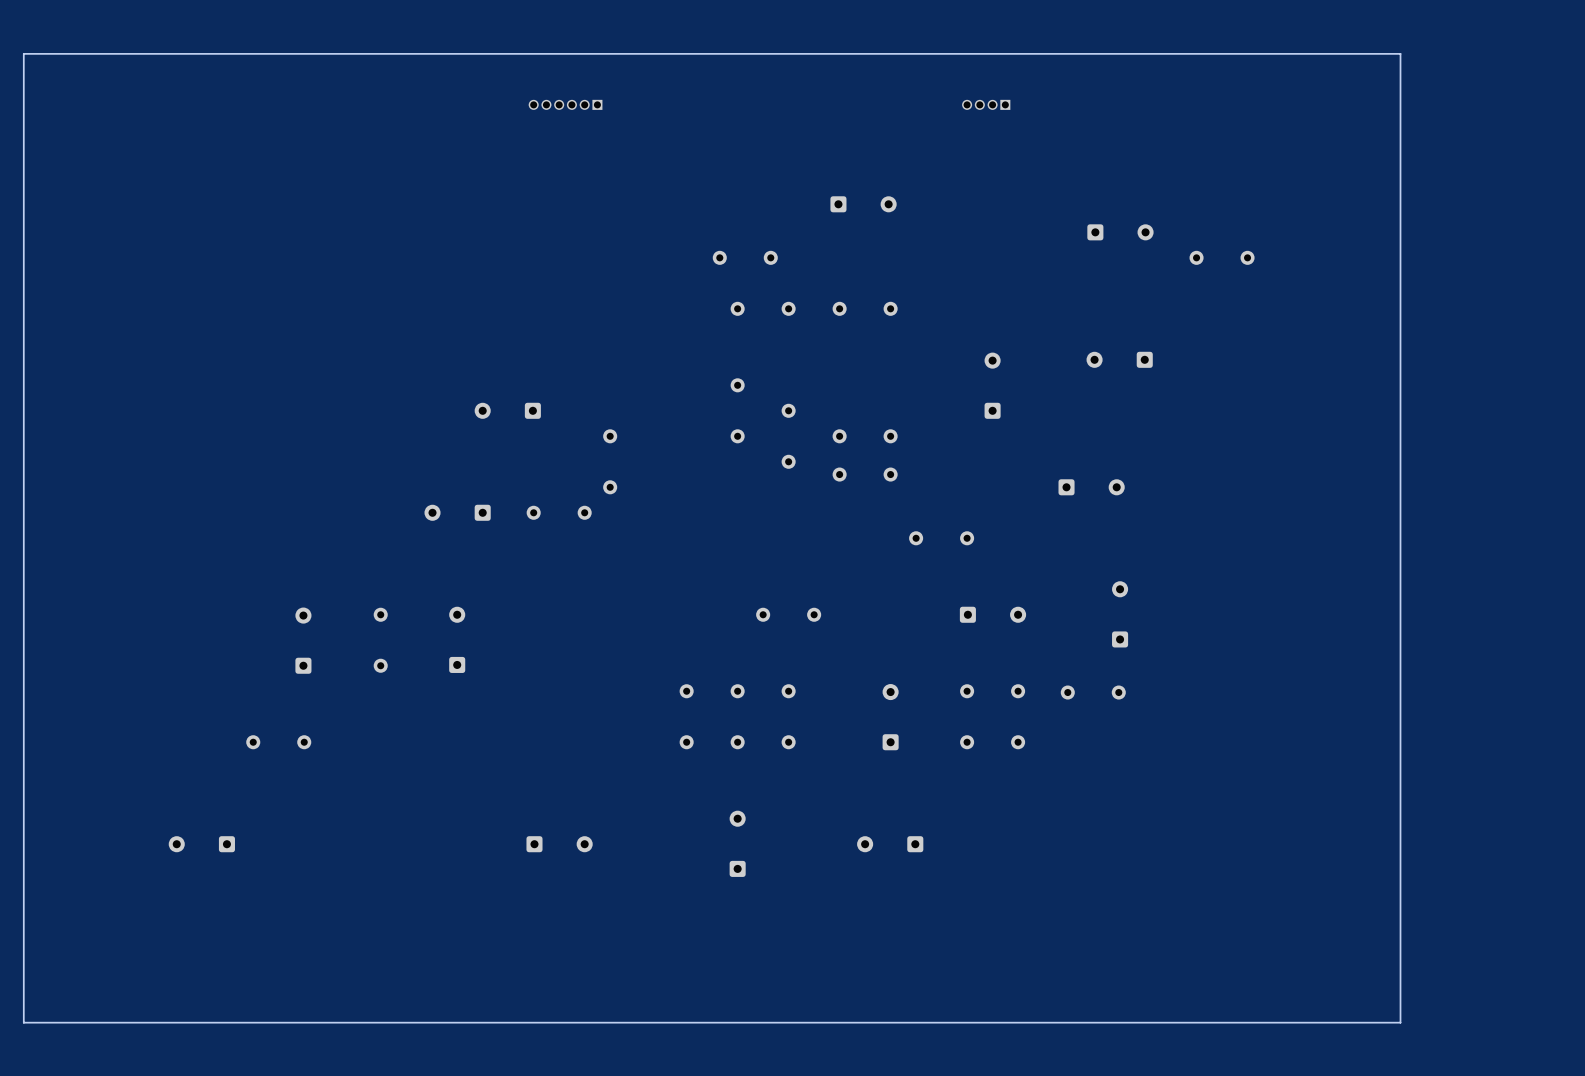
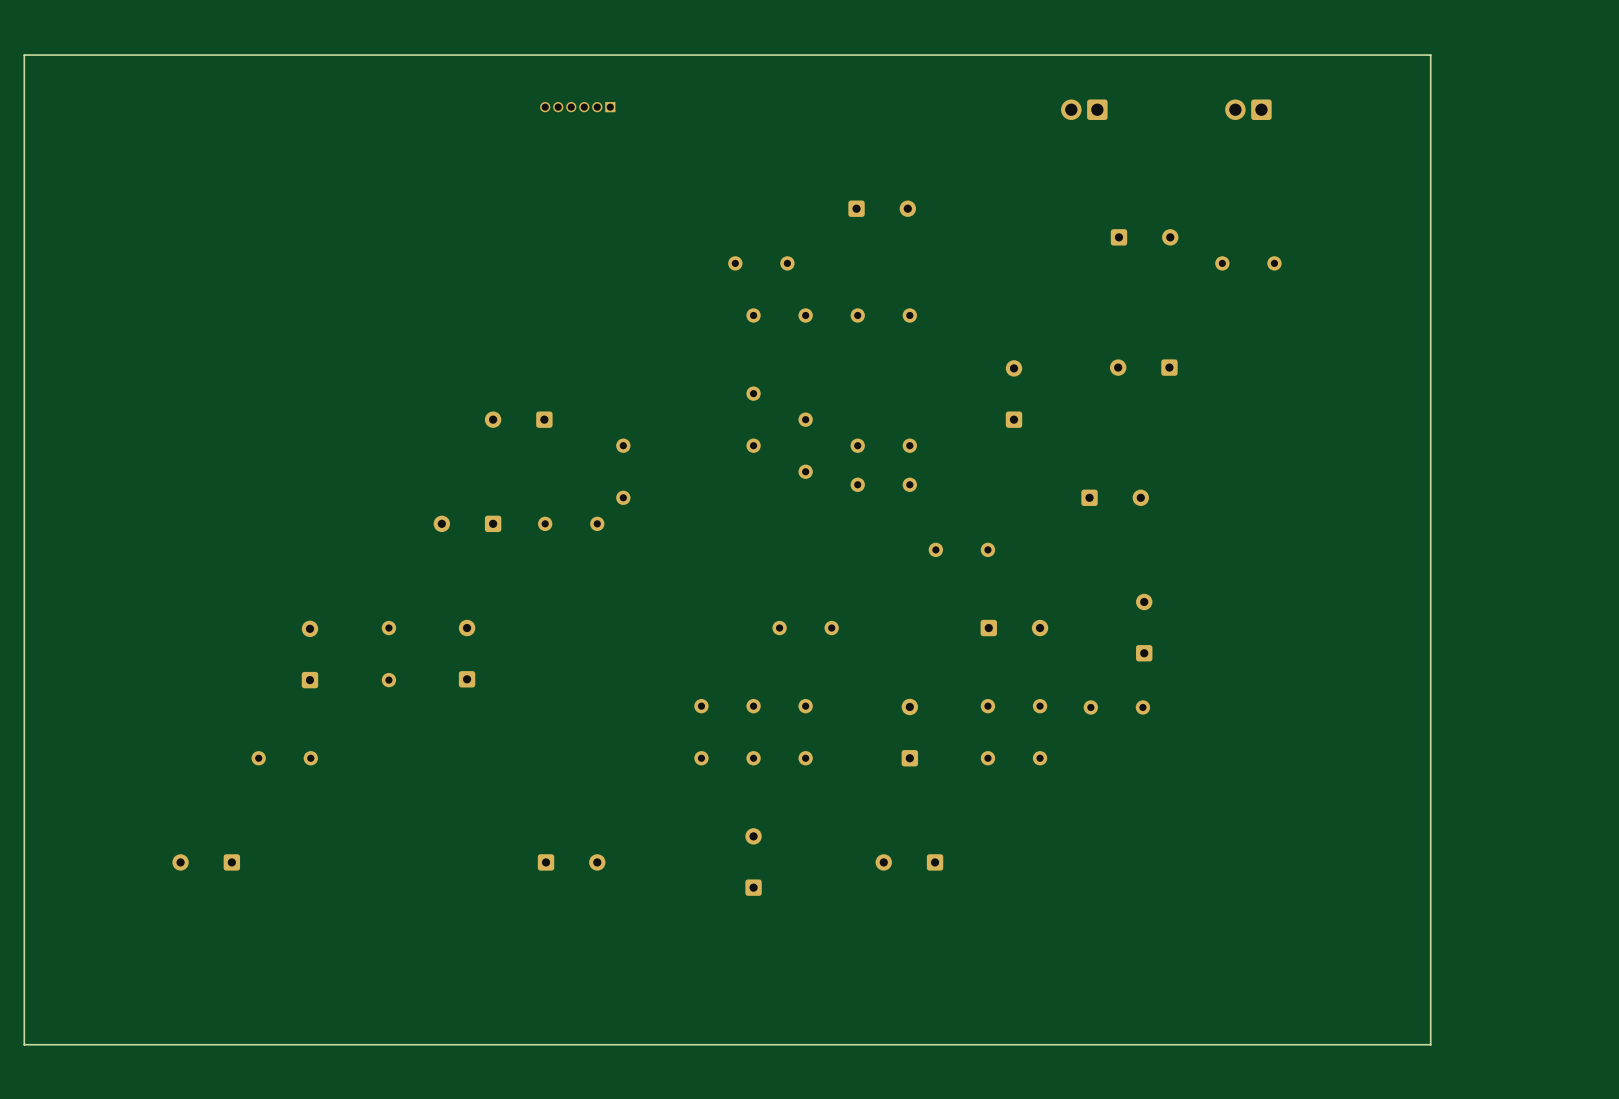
part: (986, 104) -> none
part: none -> (1084, 109)
part: none -> (1248, 109)

